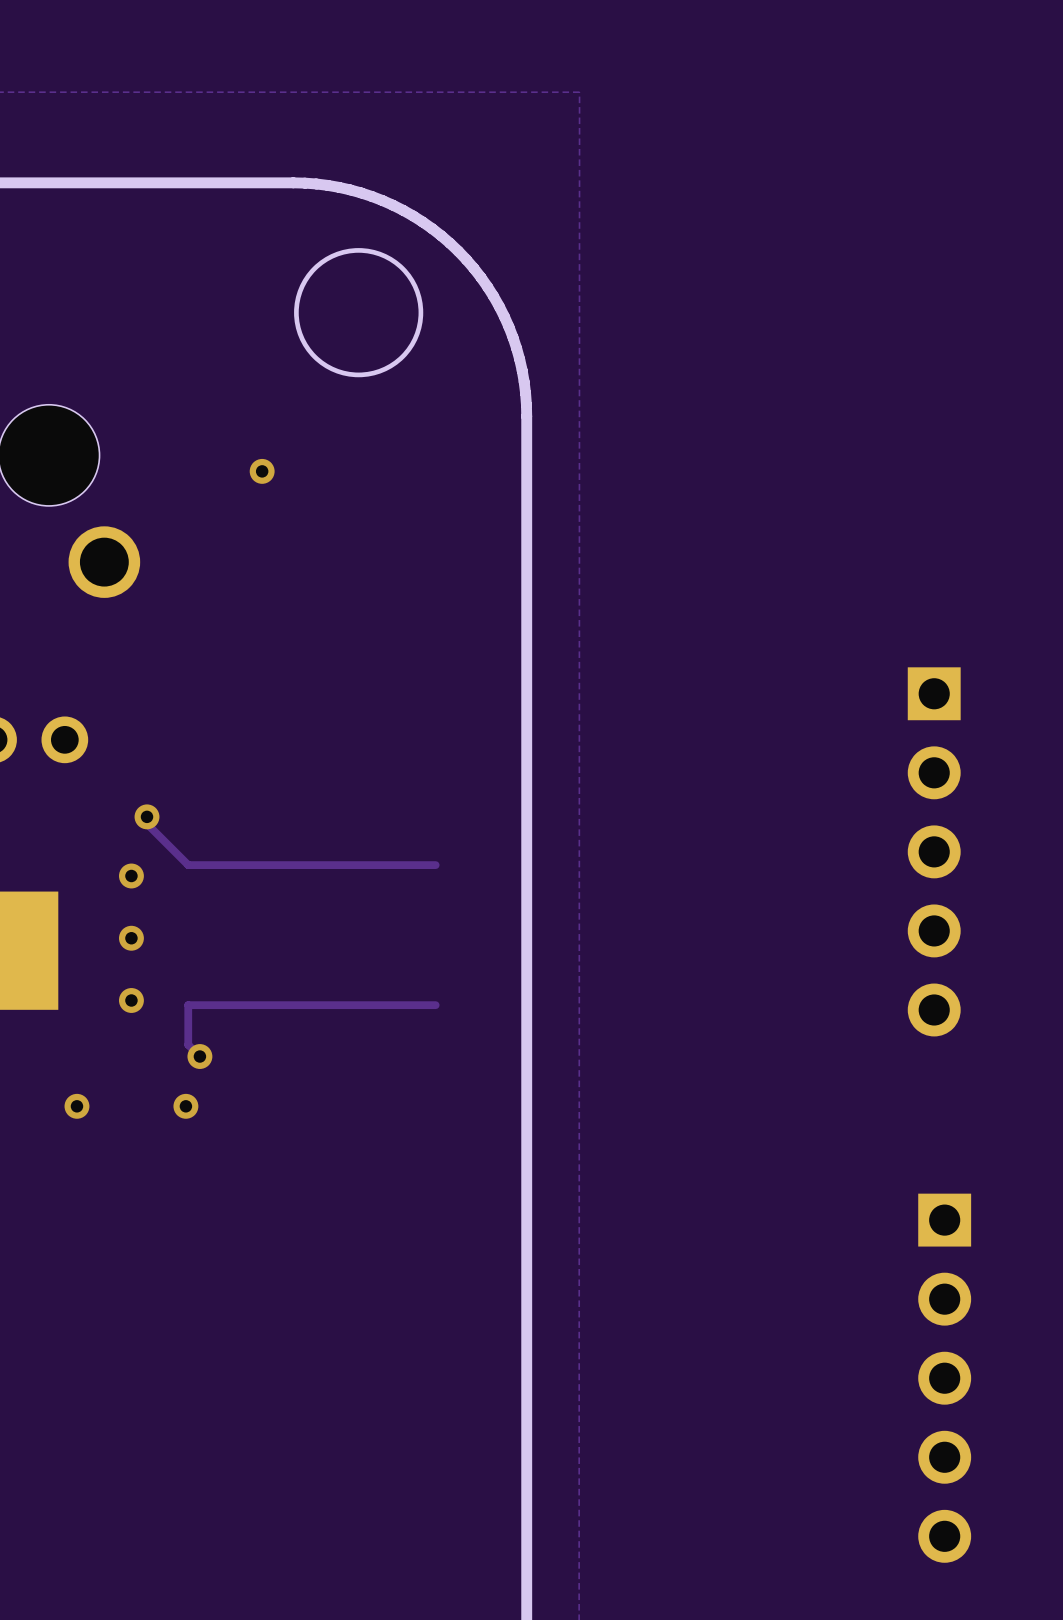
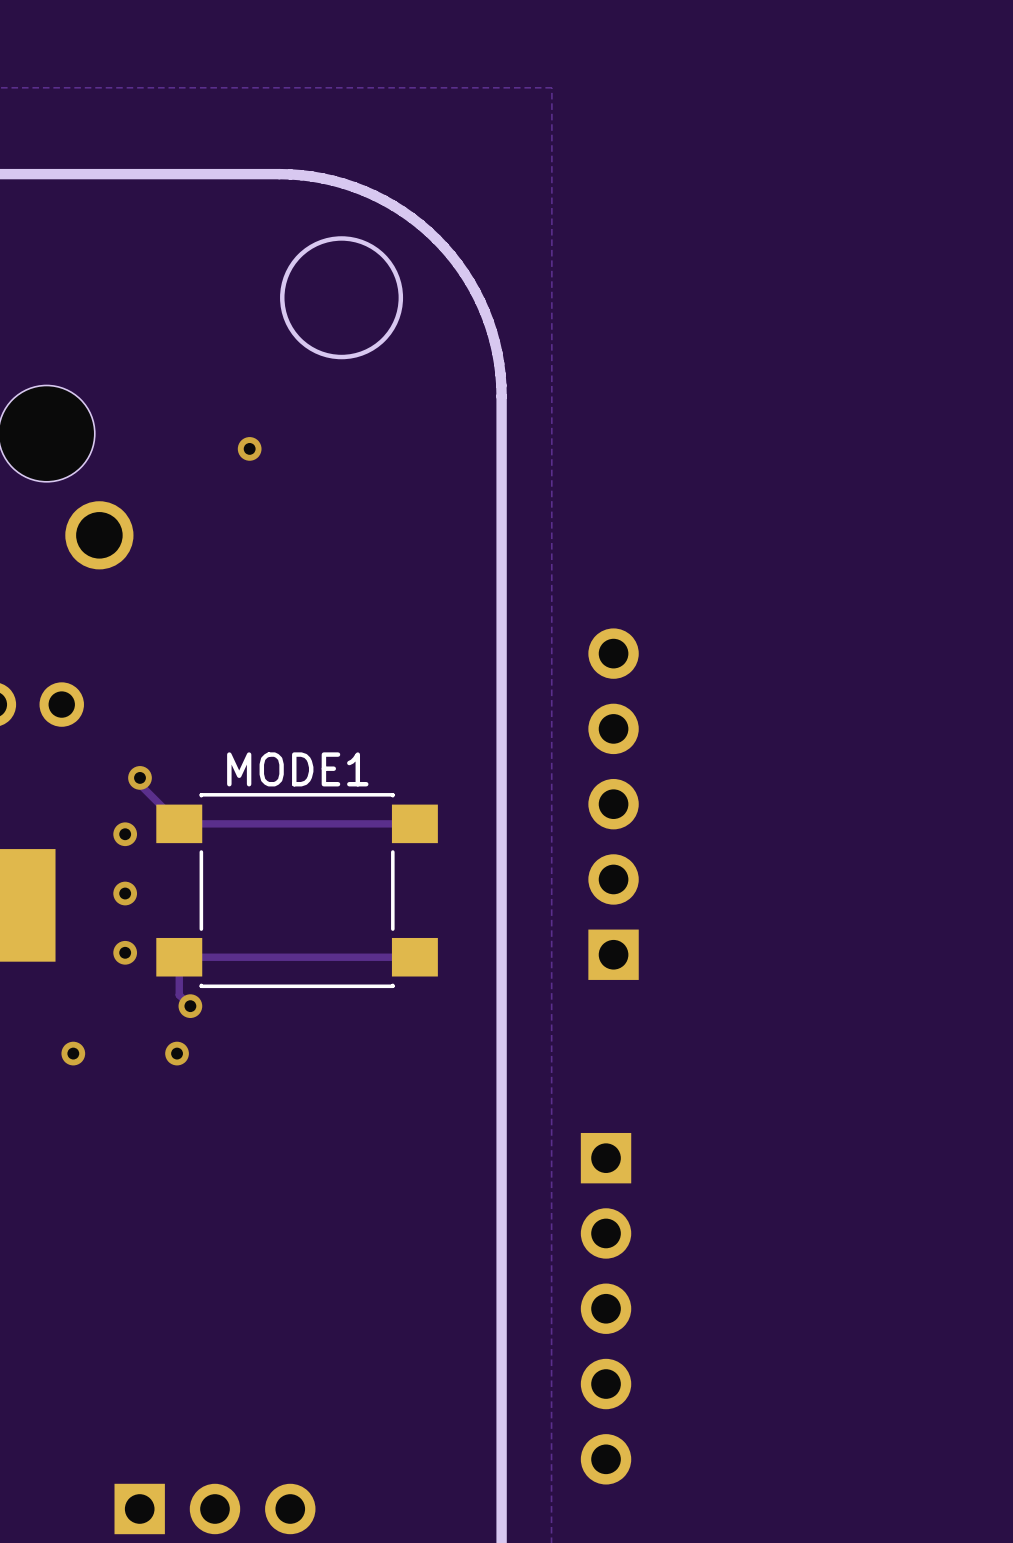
part rotation: 0° (934, 851) -> 180° (613, 804)
part position: (934, 851) -> (613, 804)
MODE1: none -> (297, 890)
part: none -> (606, 1308)
part: (944, 1378) -> none
part: none -> (214, 1508)

